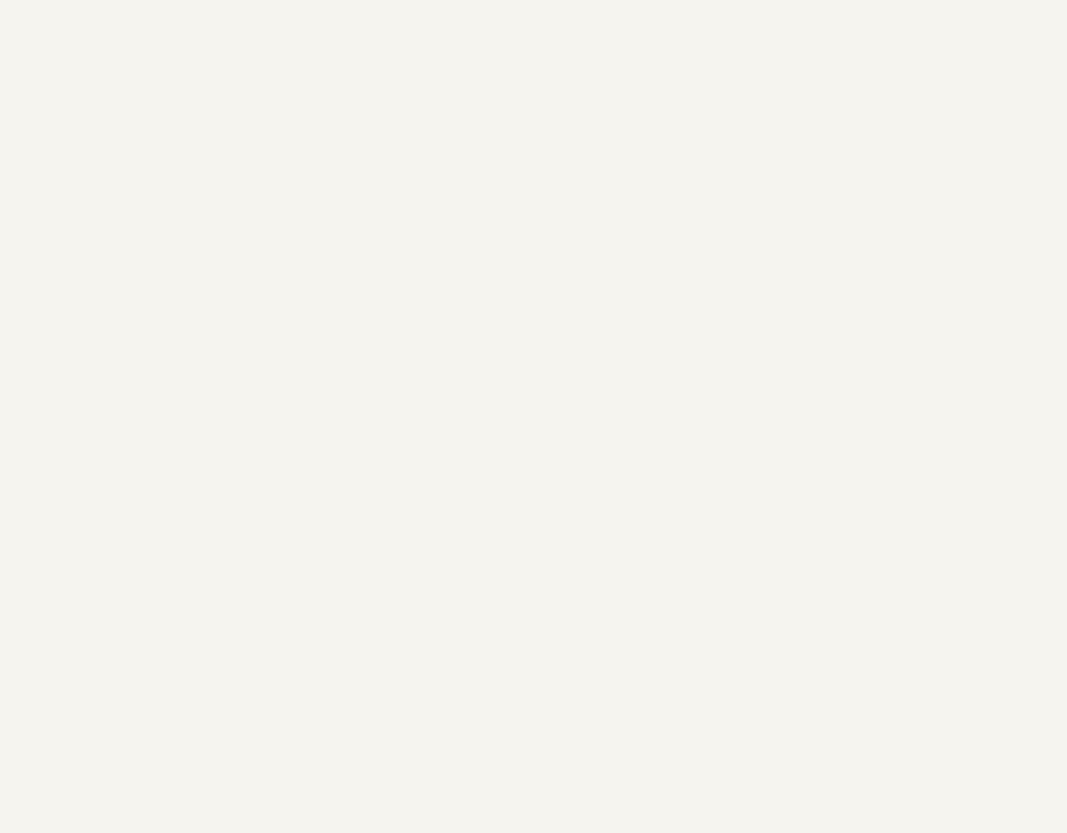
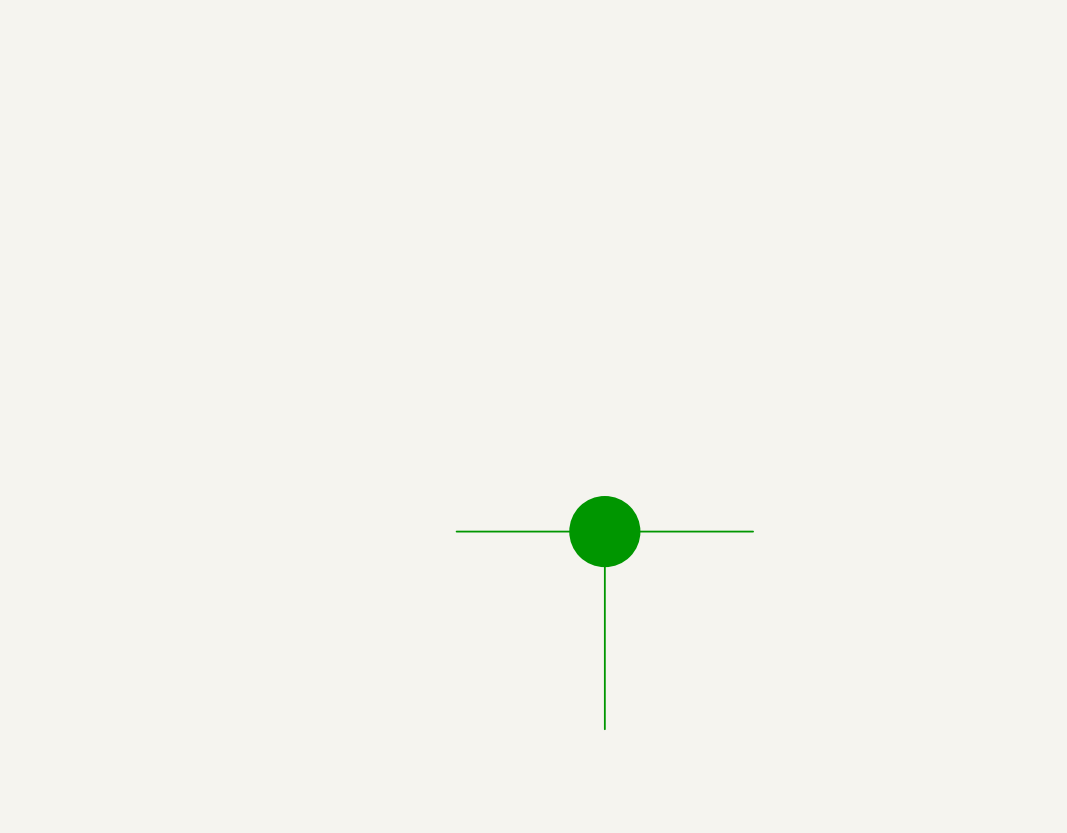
wire: none -> (456, 531) (753, 531)
wire: none -> (604, 531) (604, 729)
junction: none -> (604, 531)

